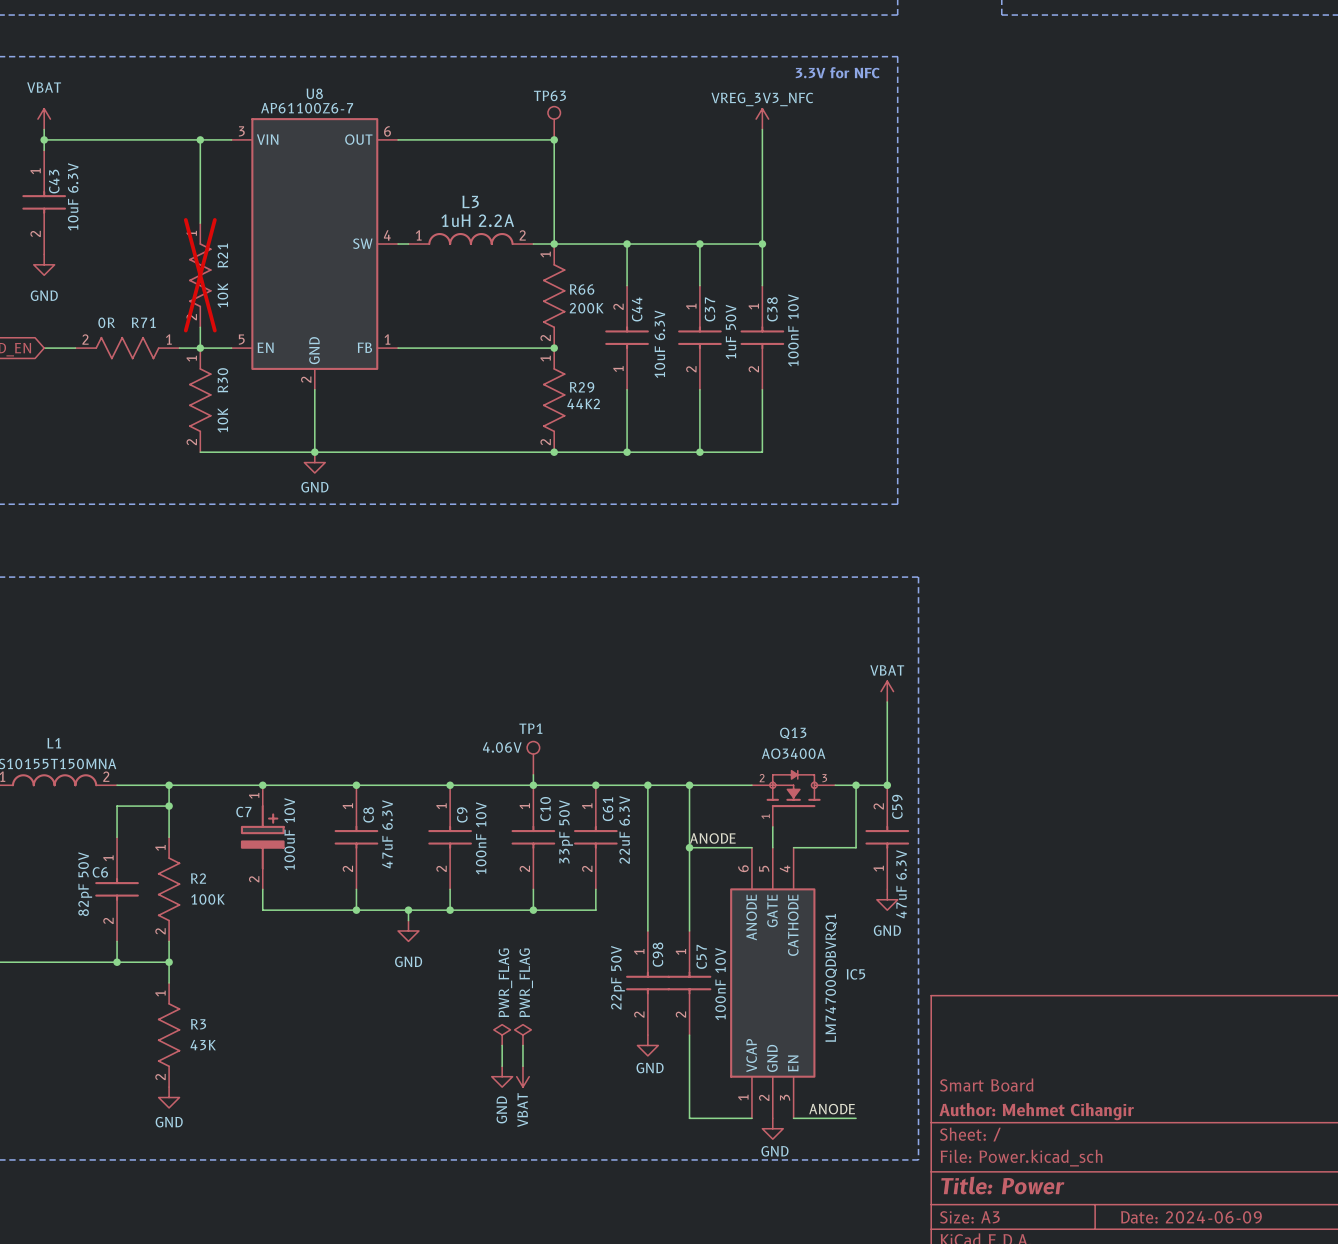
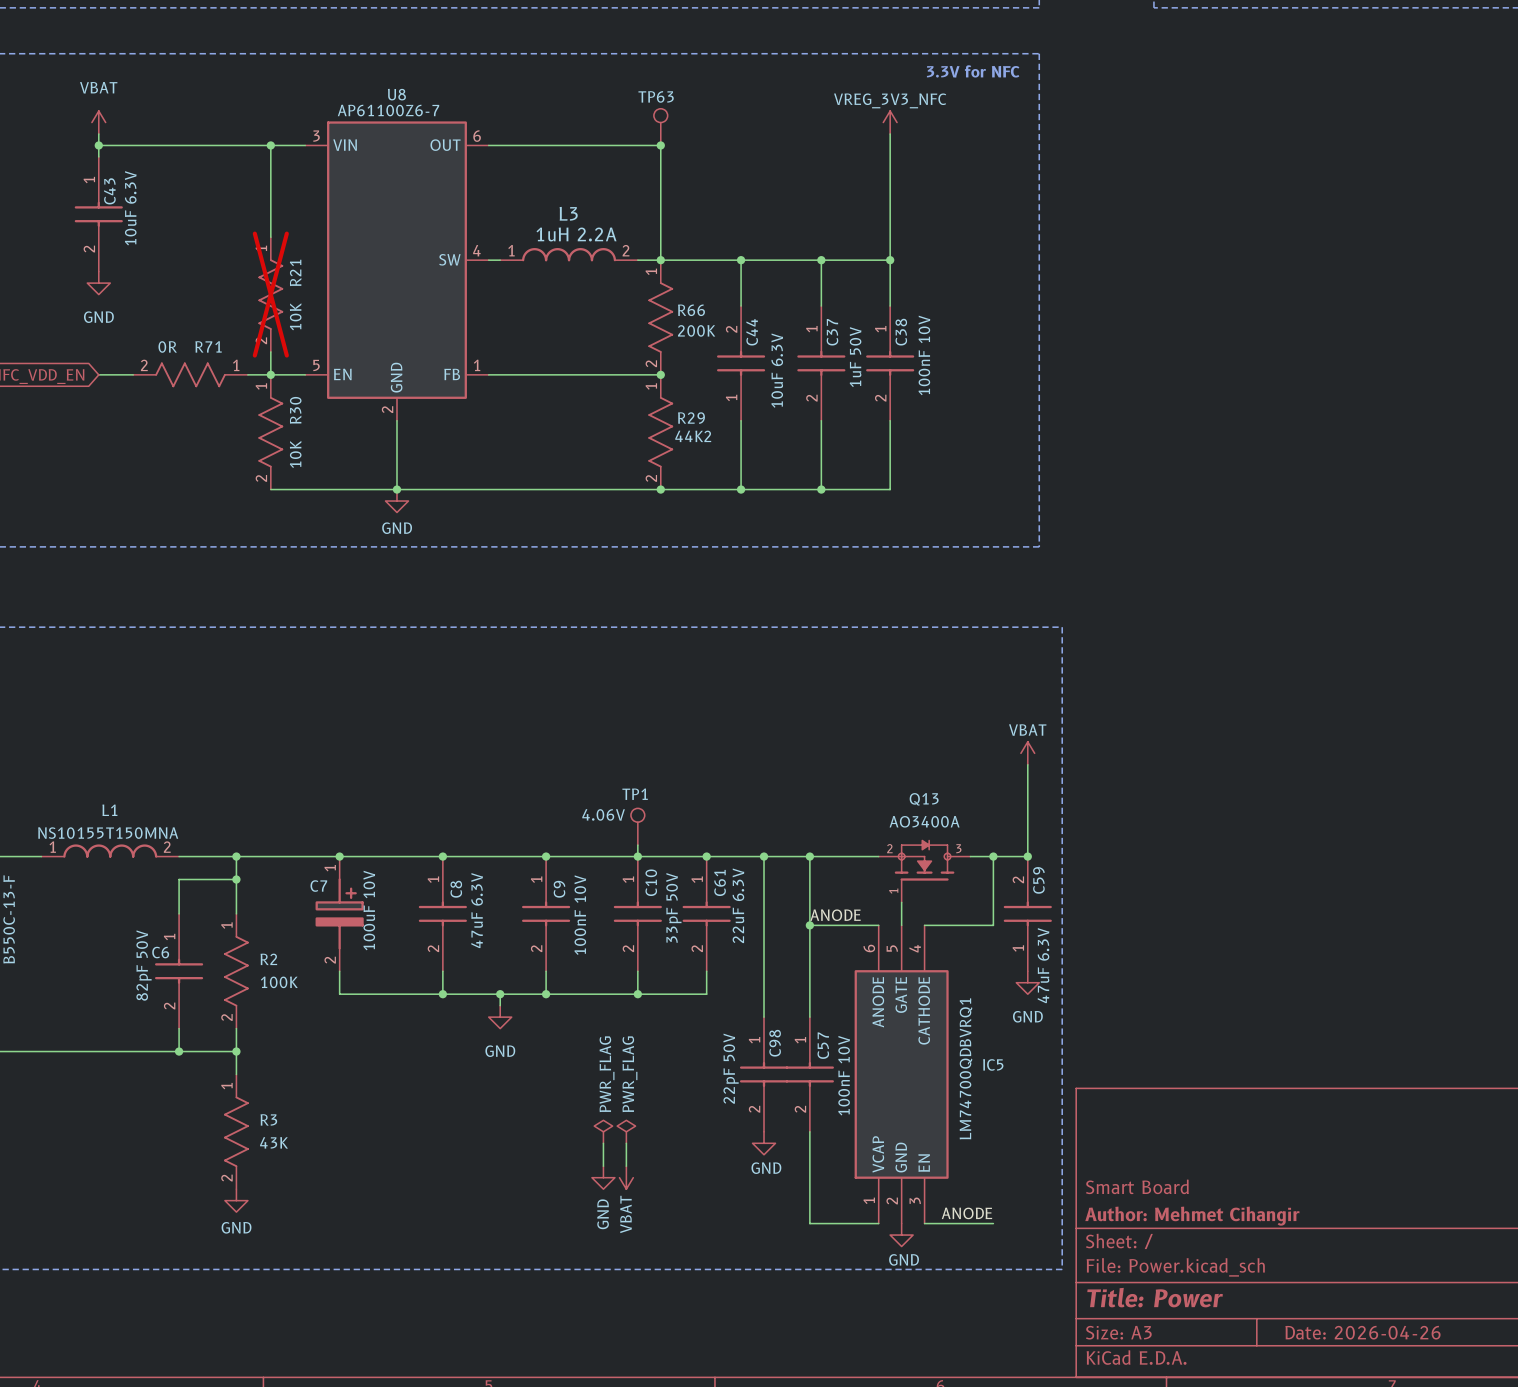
title block: Date: 2024-06-09 (1191, 1217) -> Date: 2026-04-26 (1362, 1332)

